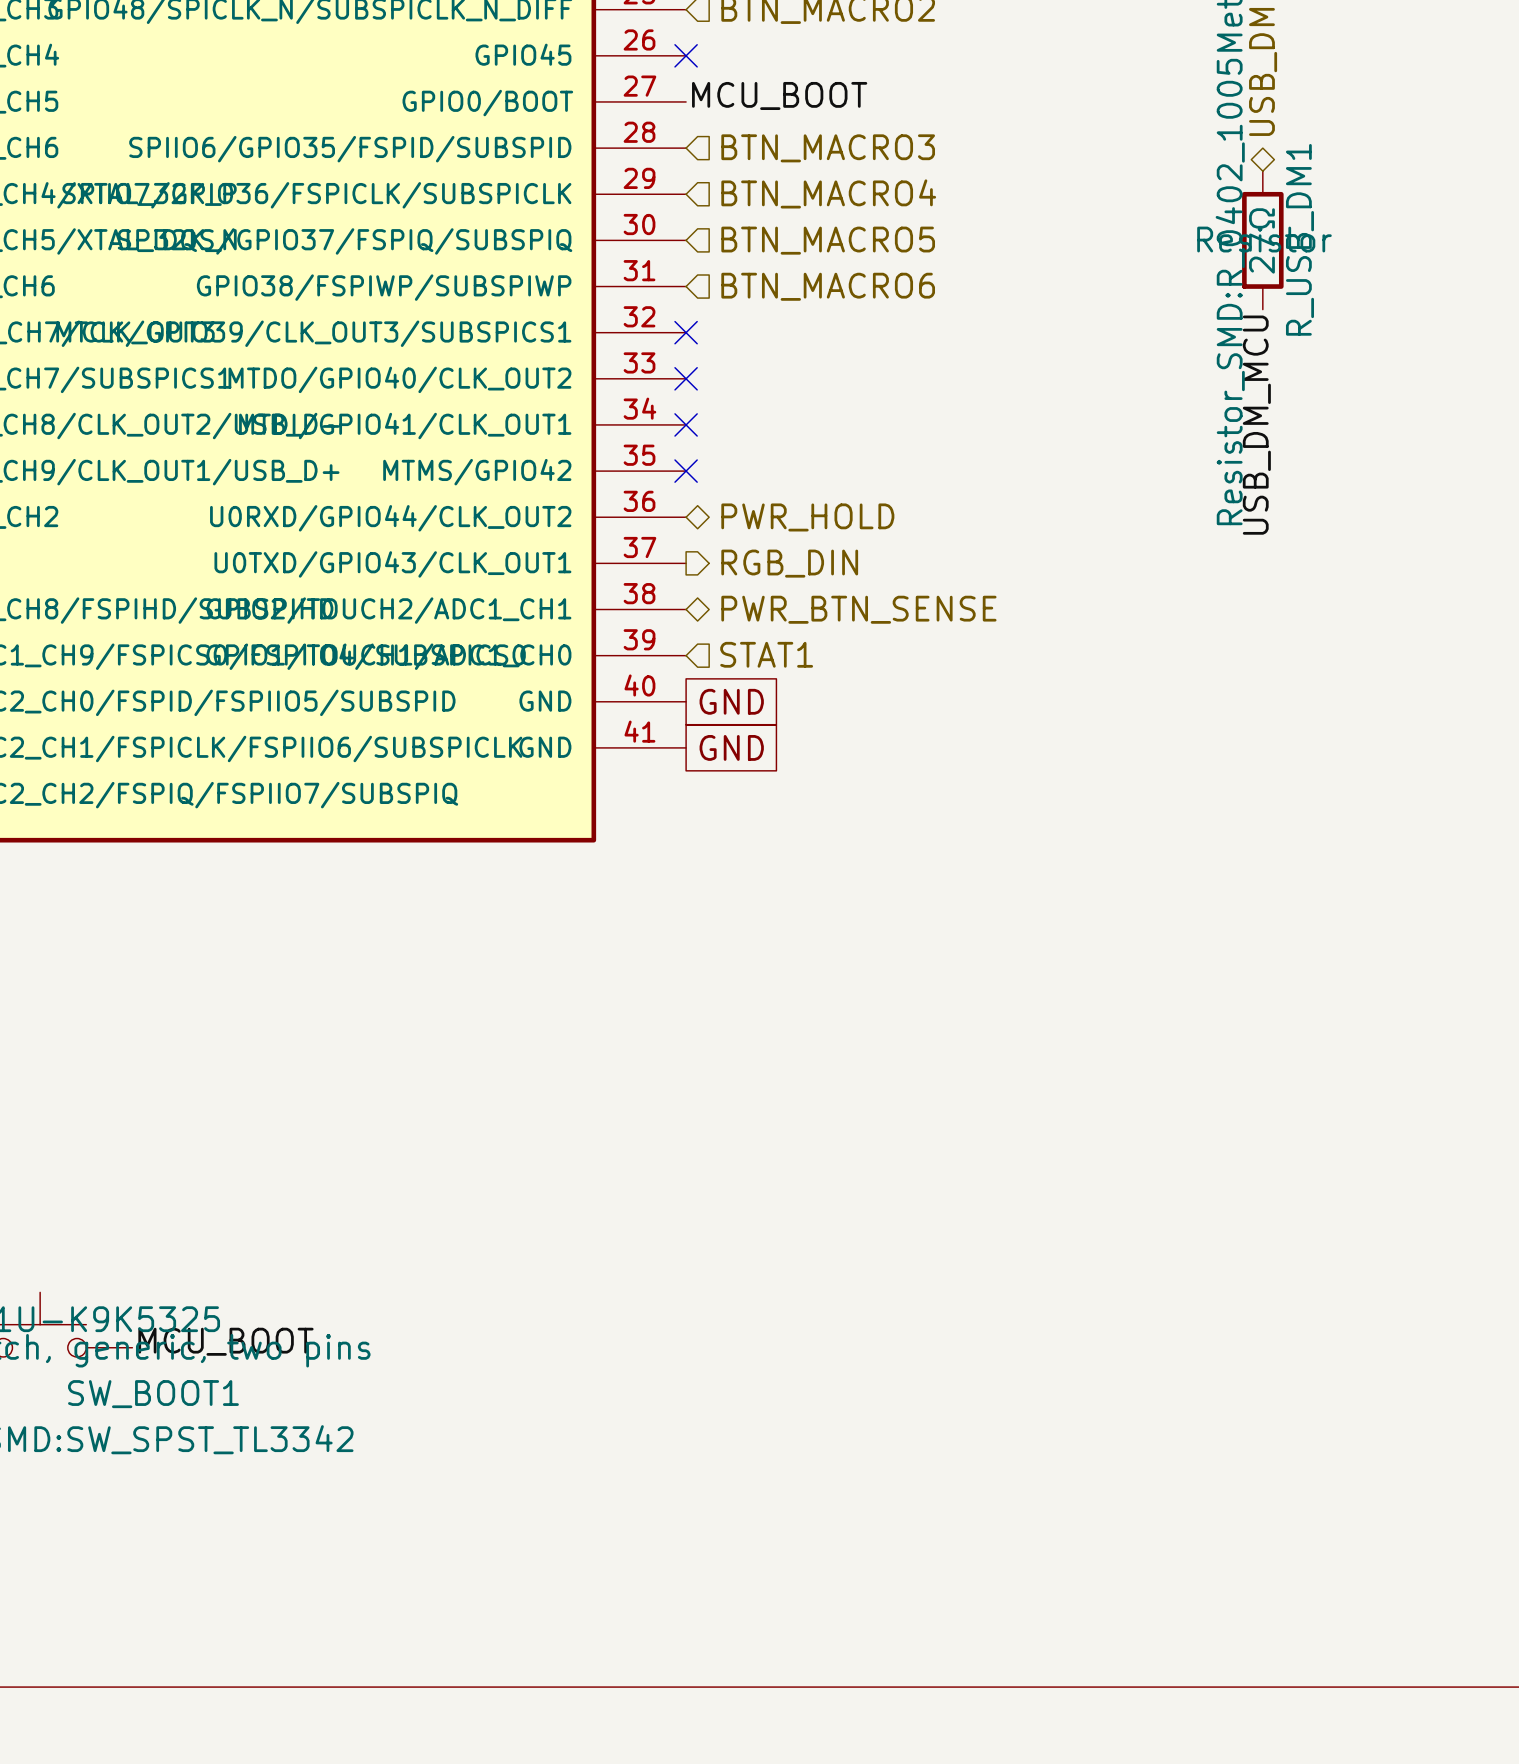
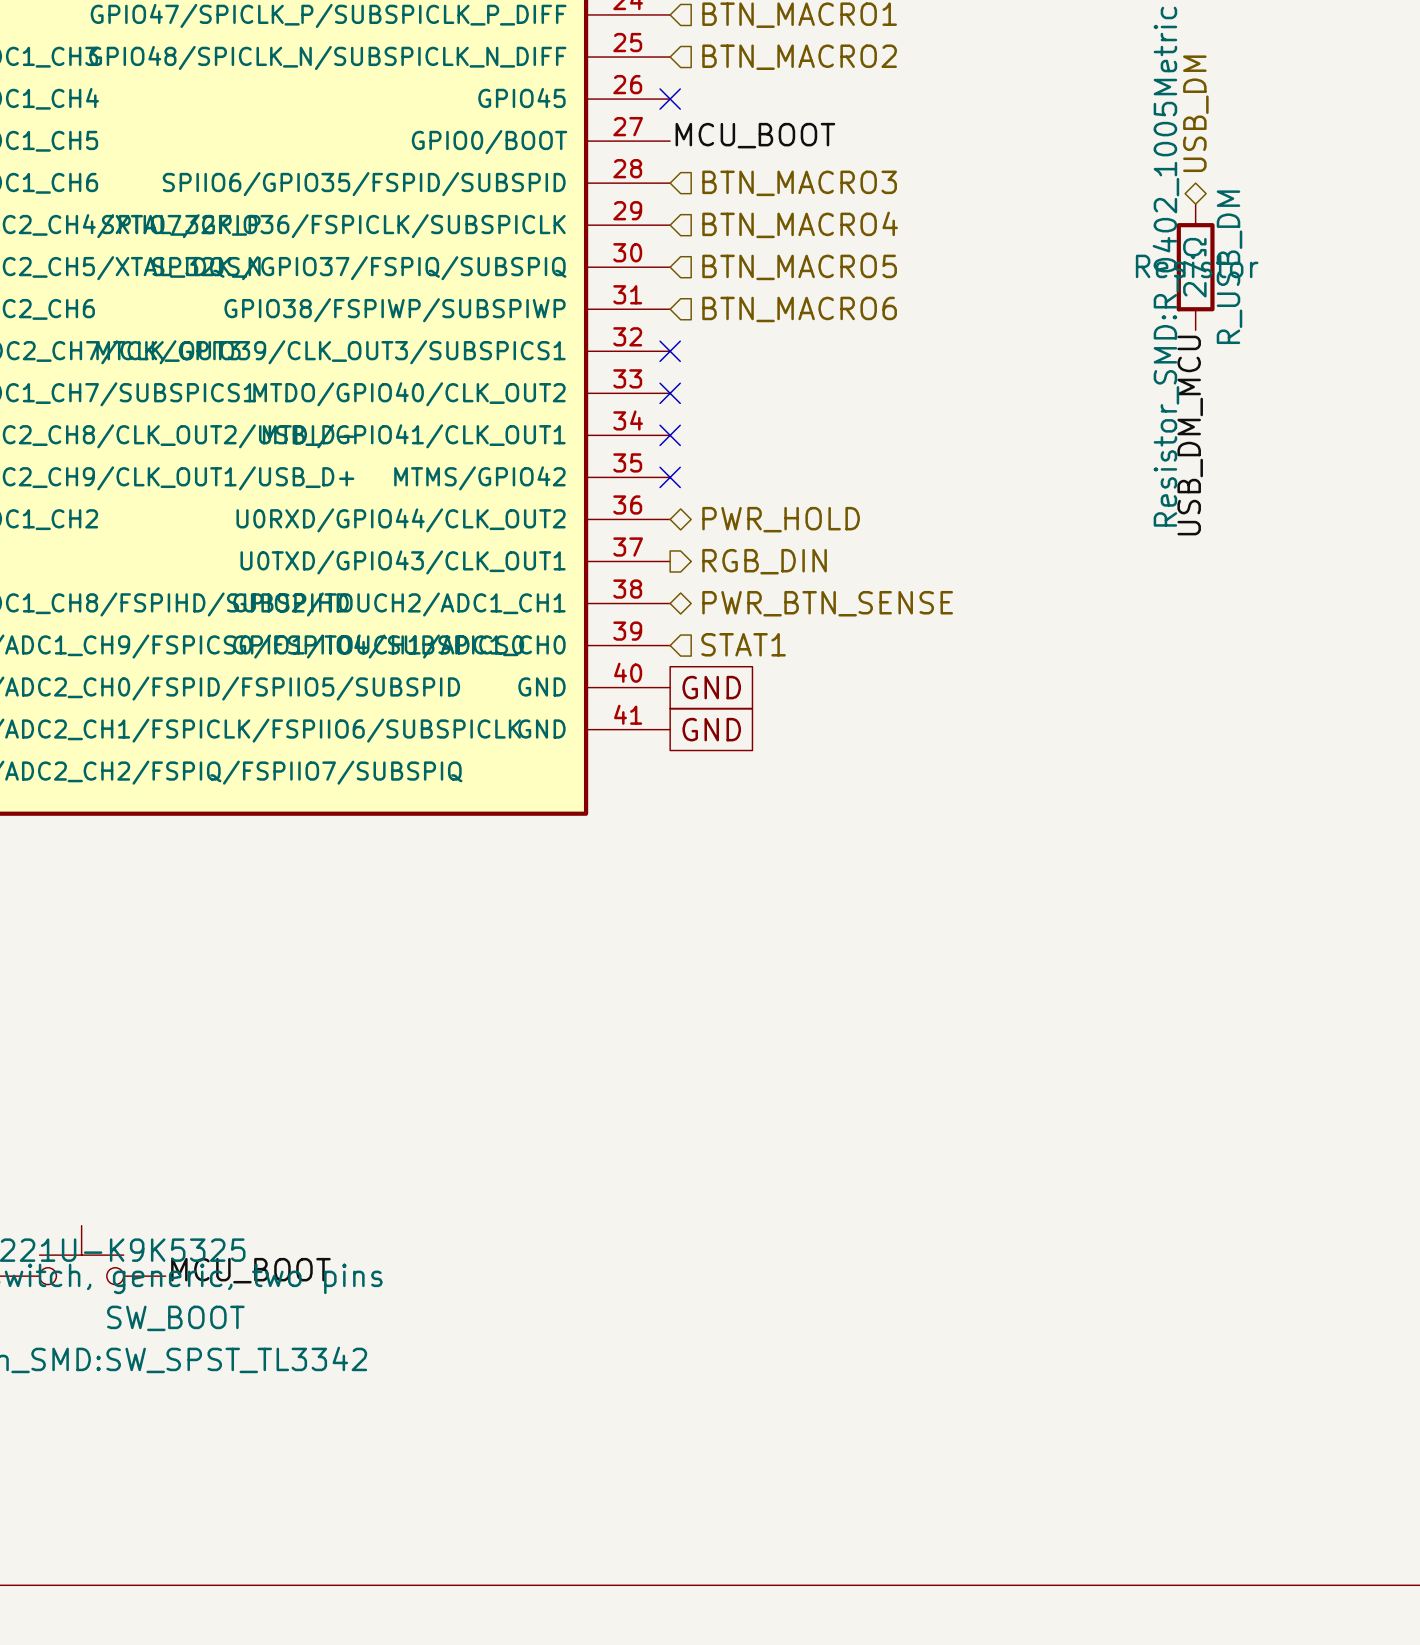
R_USB_DM1 name: R_USB_DM1 (1299, 239) -> R_USB_DM (1229, 267)
SW_BOOT1 name: SW_BOOT1 (153, 1394) -> SW_BOOT (175, 1318)

